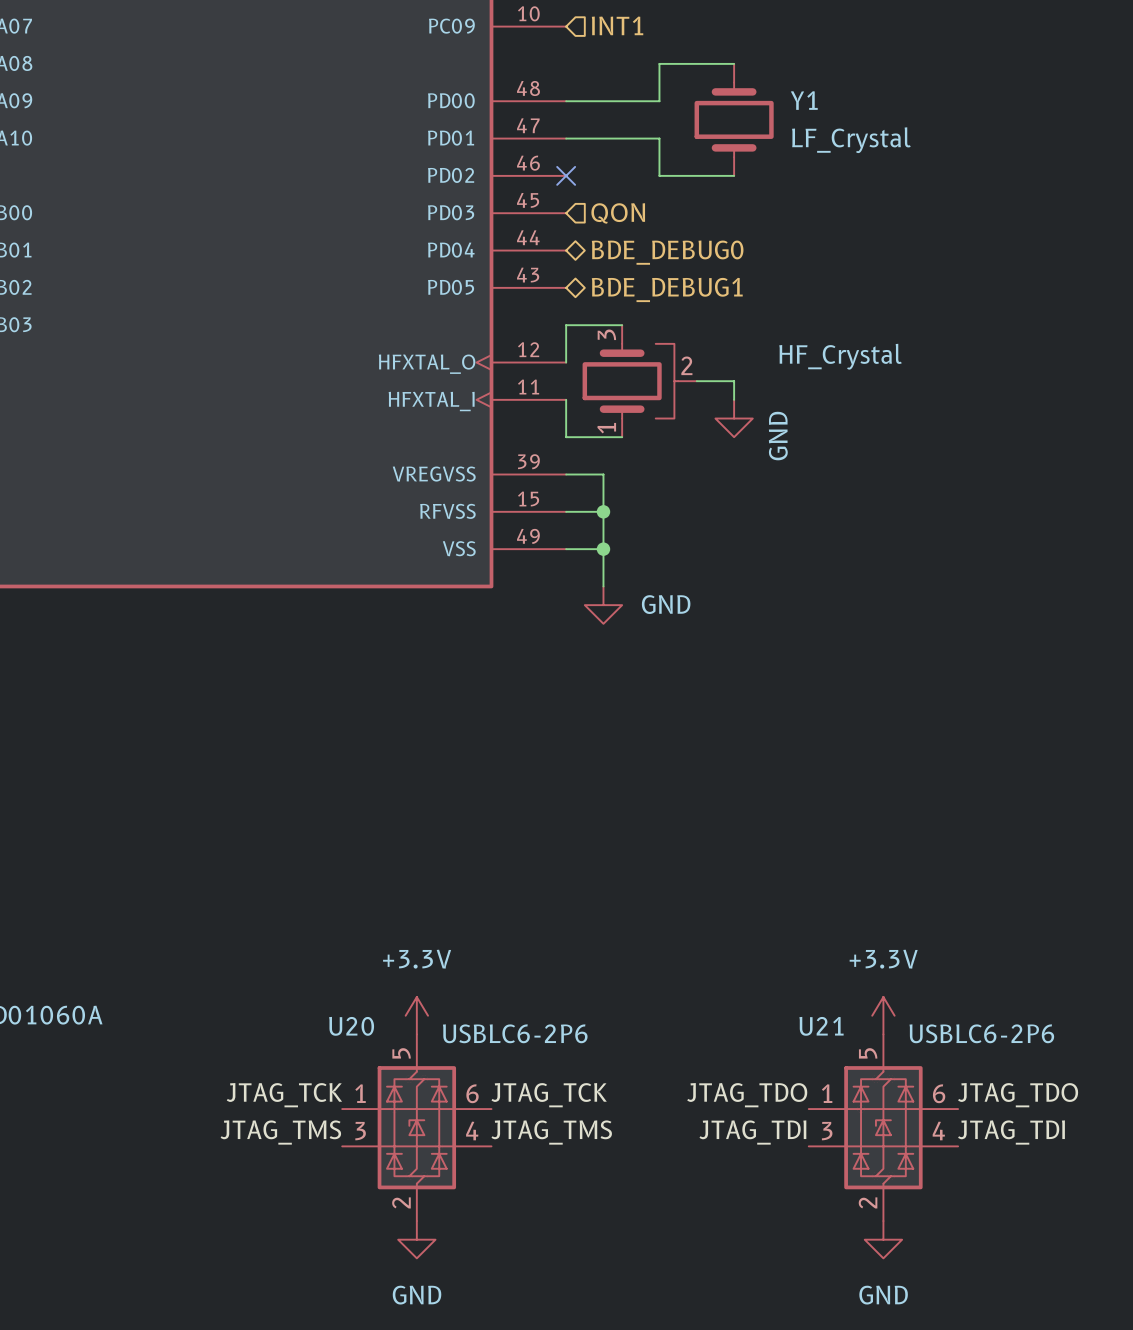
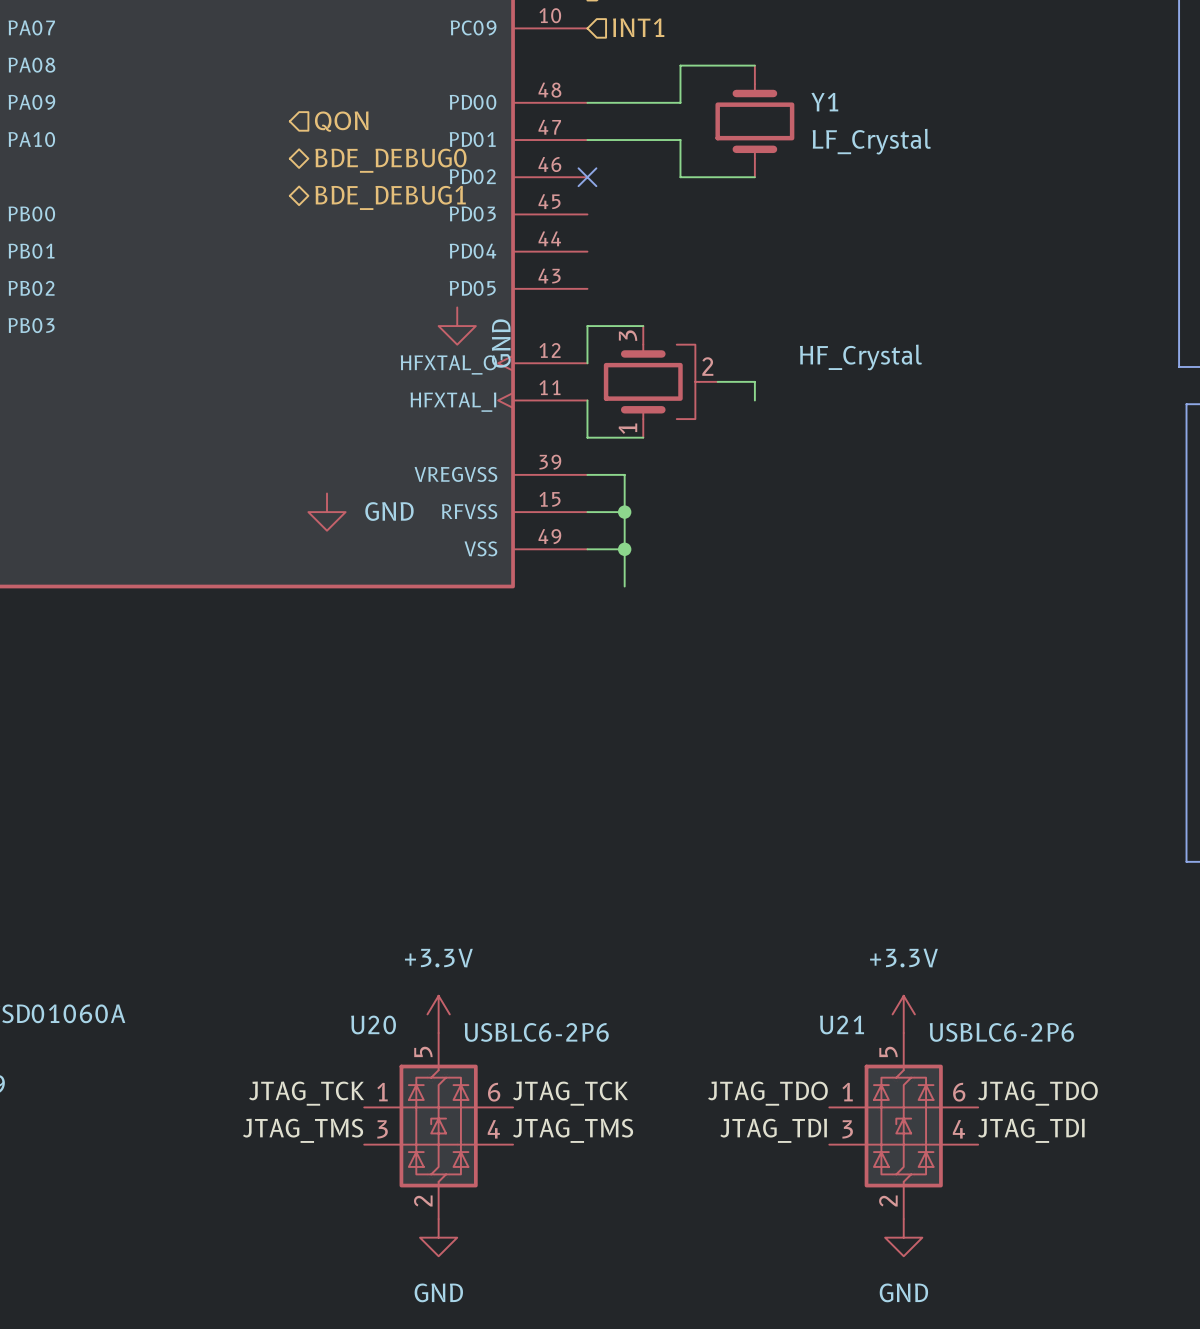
hierarchical label position: QON (618, 213) -> QON (341, 121)
hierarchical label position: BDE_DEBUG0 (667, 252) -> BDE_DEBUG0 (390, 160)
hierarchical label position: BDE_DEBUG1 (667, 289) -> BDE_DEBUG1 (390, 197)
power symbol: none -> GND (457, 326)
power symbol: GND (734, 418) -> none
power symbol: none -> GND (327, 512)
power symbol: GND (603, 605) -> none

